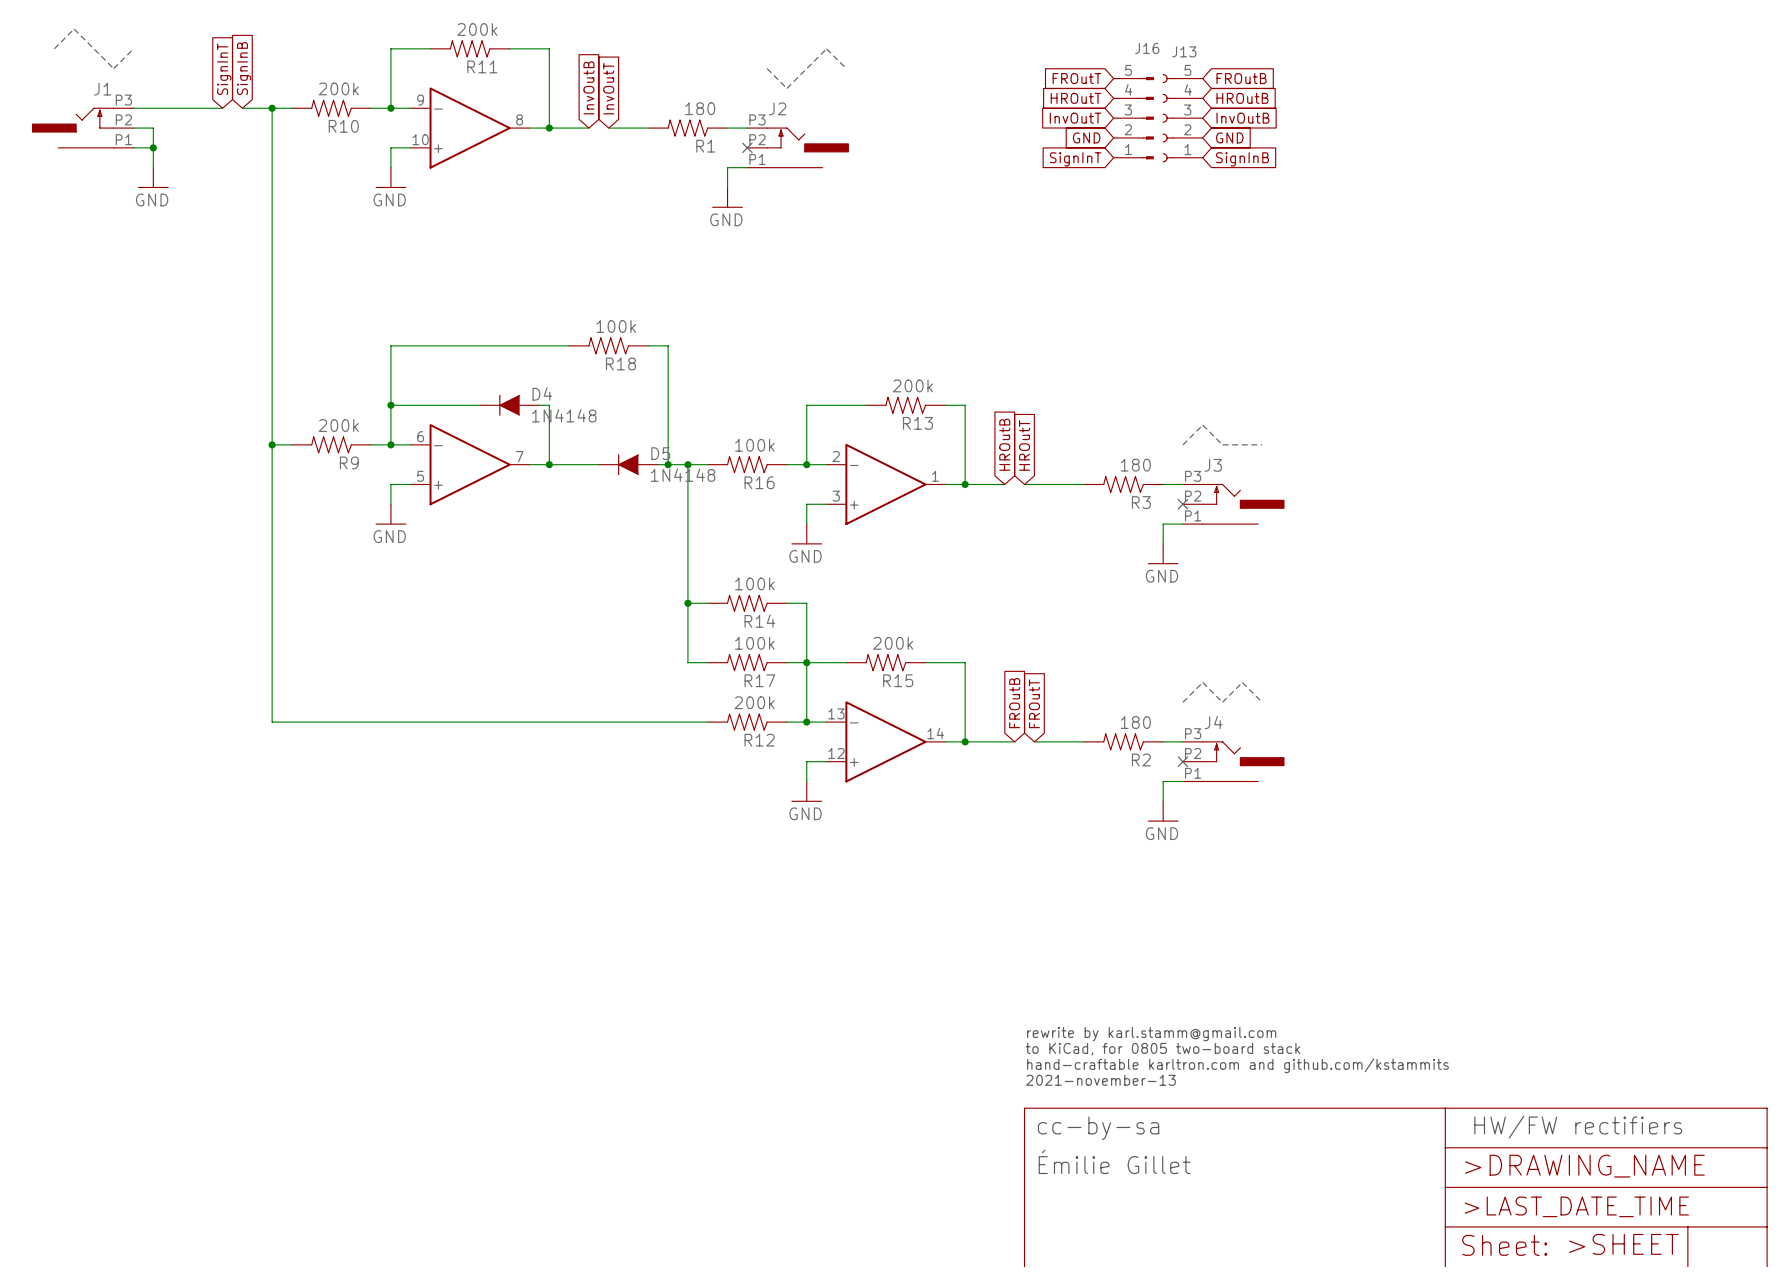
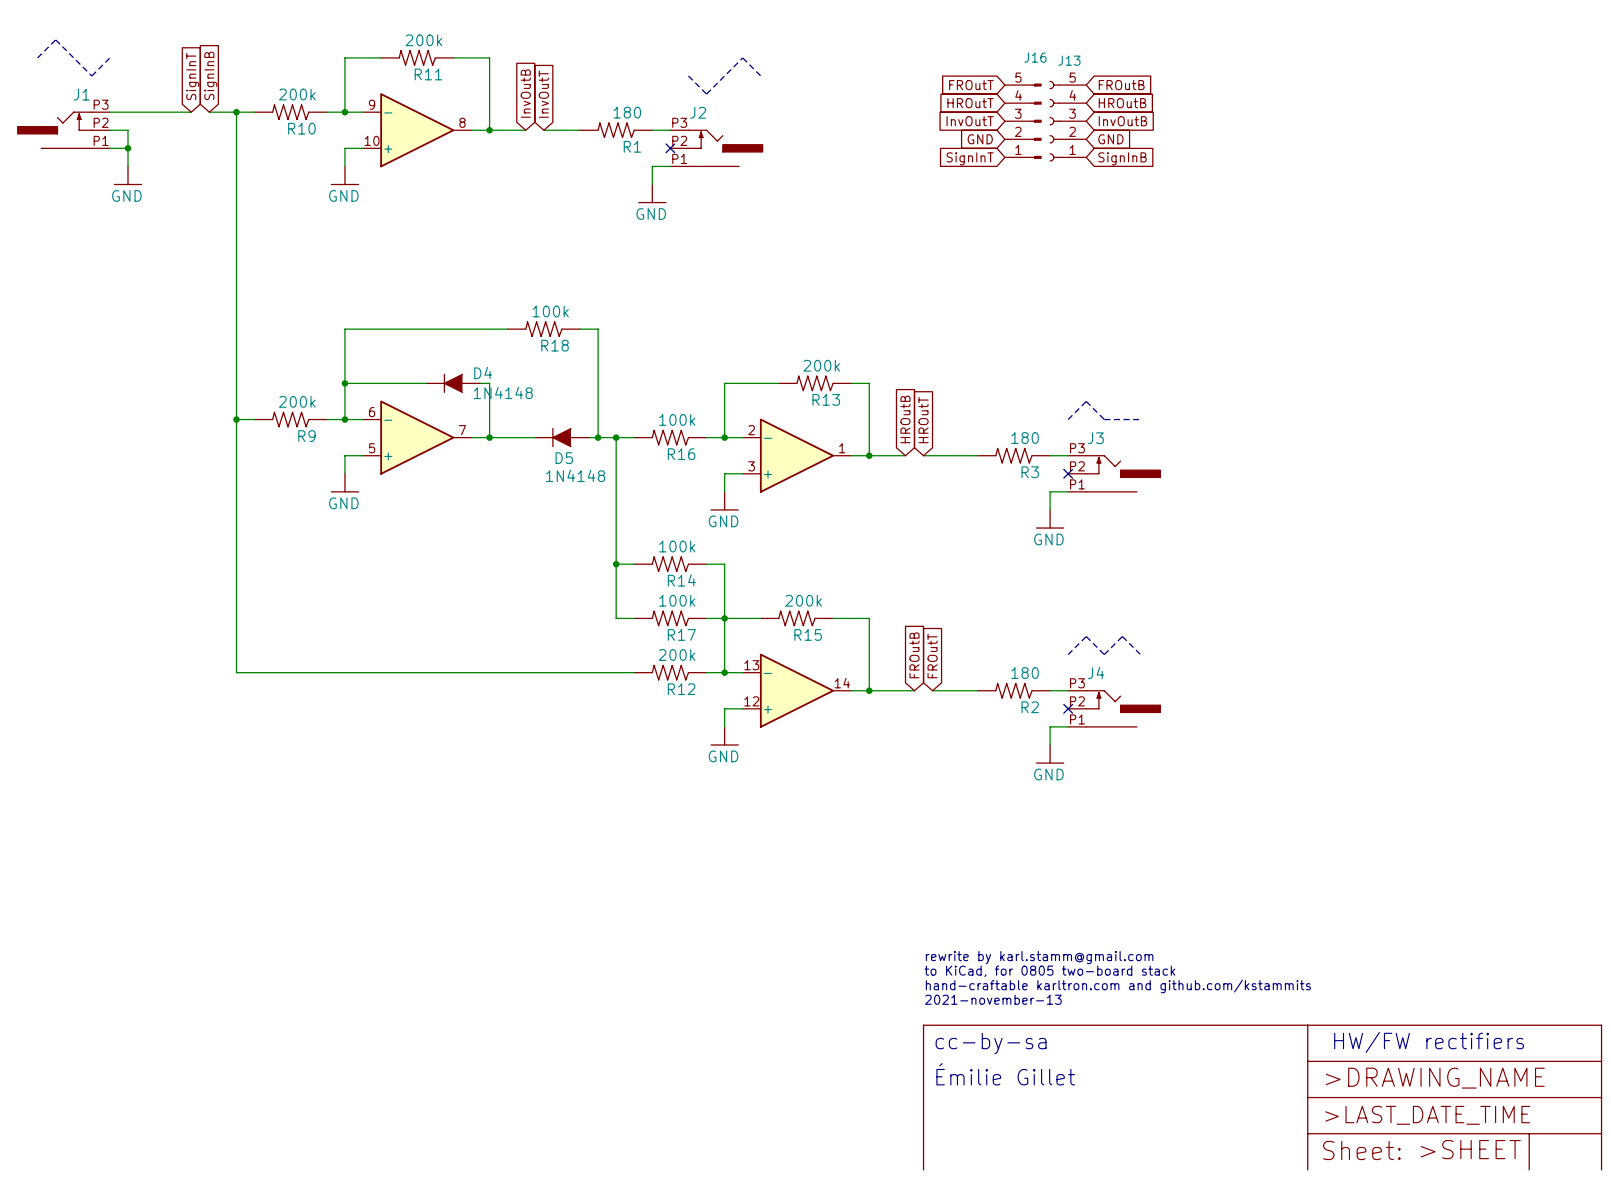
D5 name position: D5 (660, 453) -> D5 (564, 458)
D5 value position: 1N4148 (683, 475) -> 1N4148 (575, 475)

